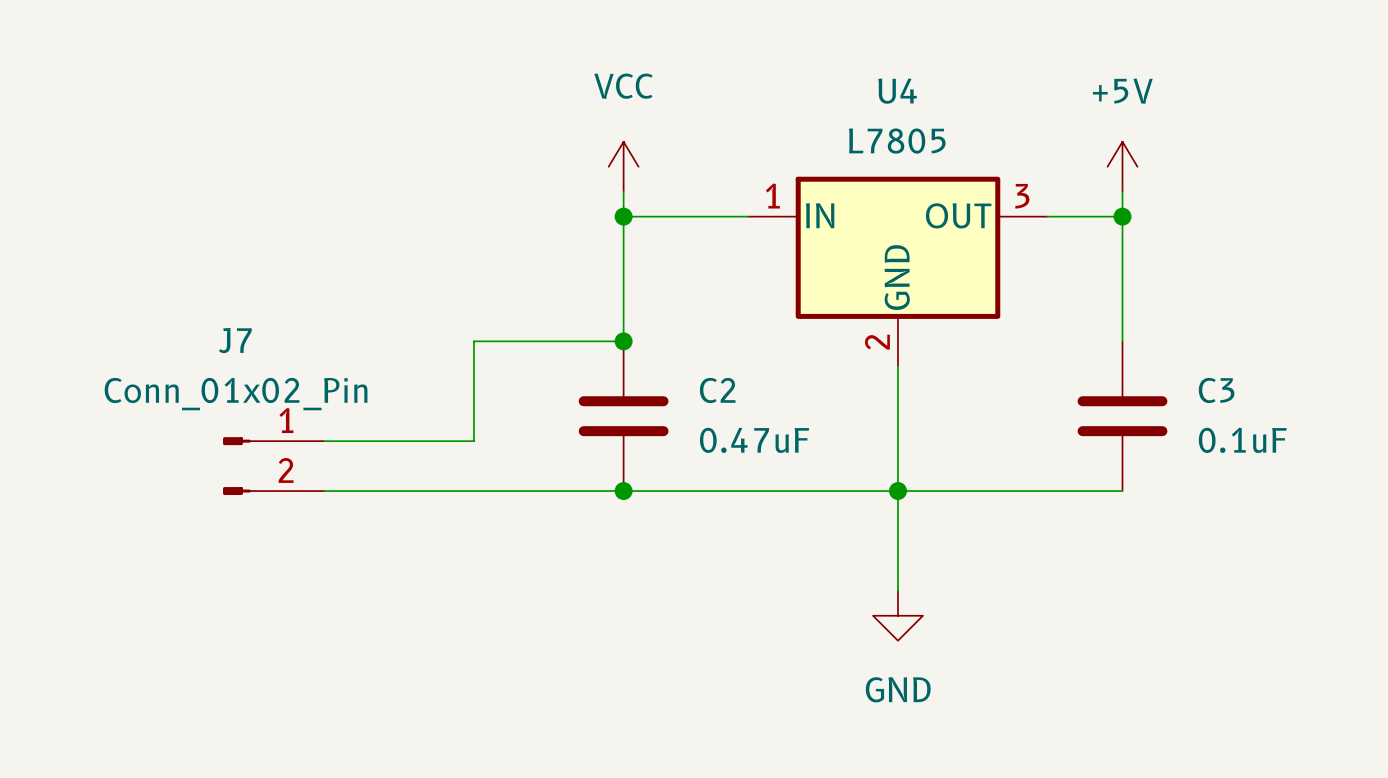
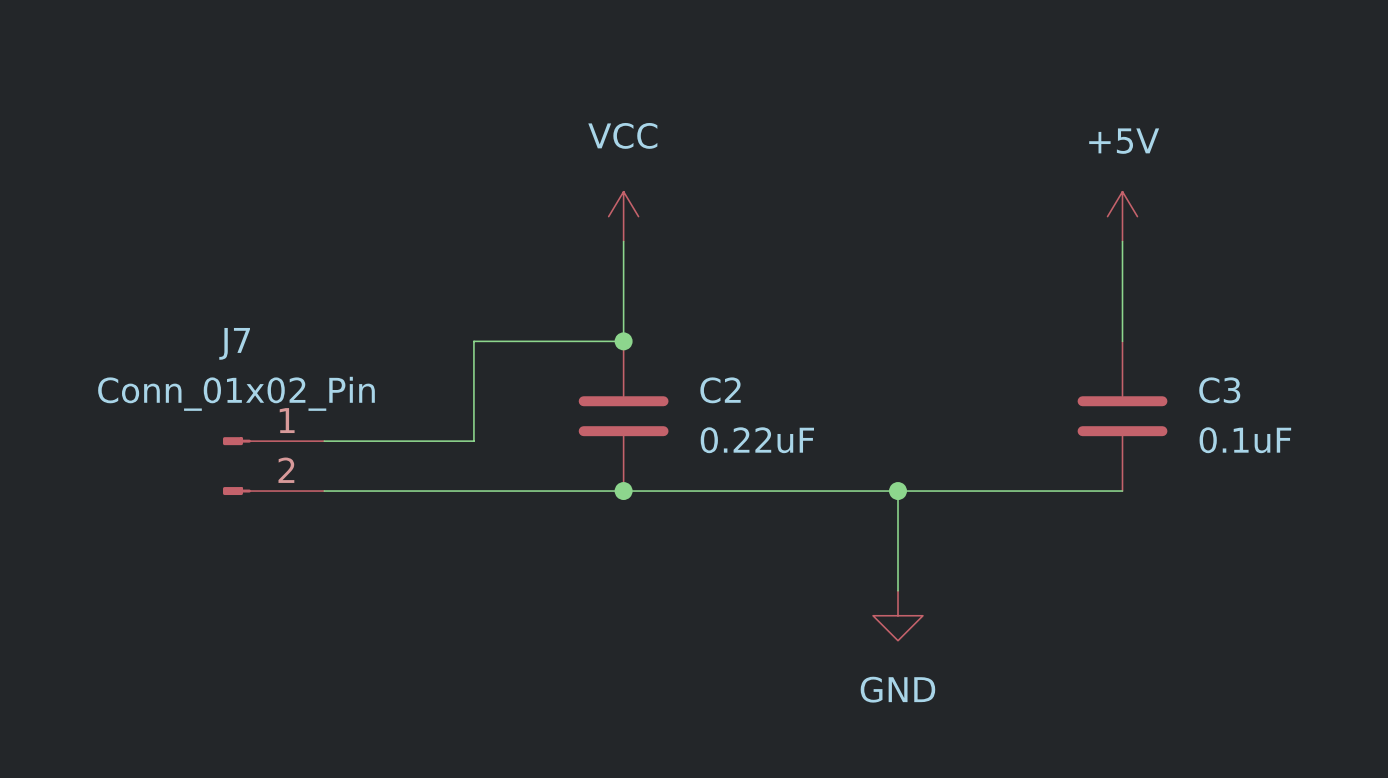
power symbol position: VCC (623, 166) -> VCC (623, 216)
power symbol position: +5V (1122, 166) -> +5V (1122, 216)
wire: (623, 216) (748, 216) -> none
junction: (623, 216) -> none
wire: (1047, 216) (1122, 216) -> none
junction: (1122, 216) -> none
U4: L7805 (898, 271) -> none
wire: (898, 366) (898, 491) -> none
C2 value: 0.47uF (754, 440) -> 0.22uF (757, 440)

